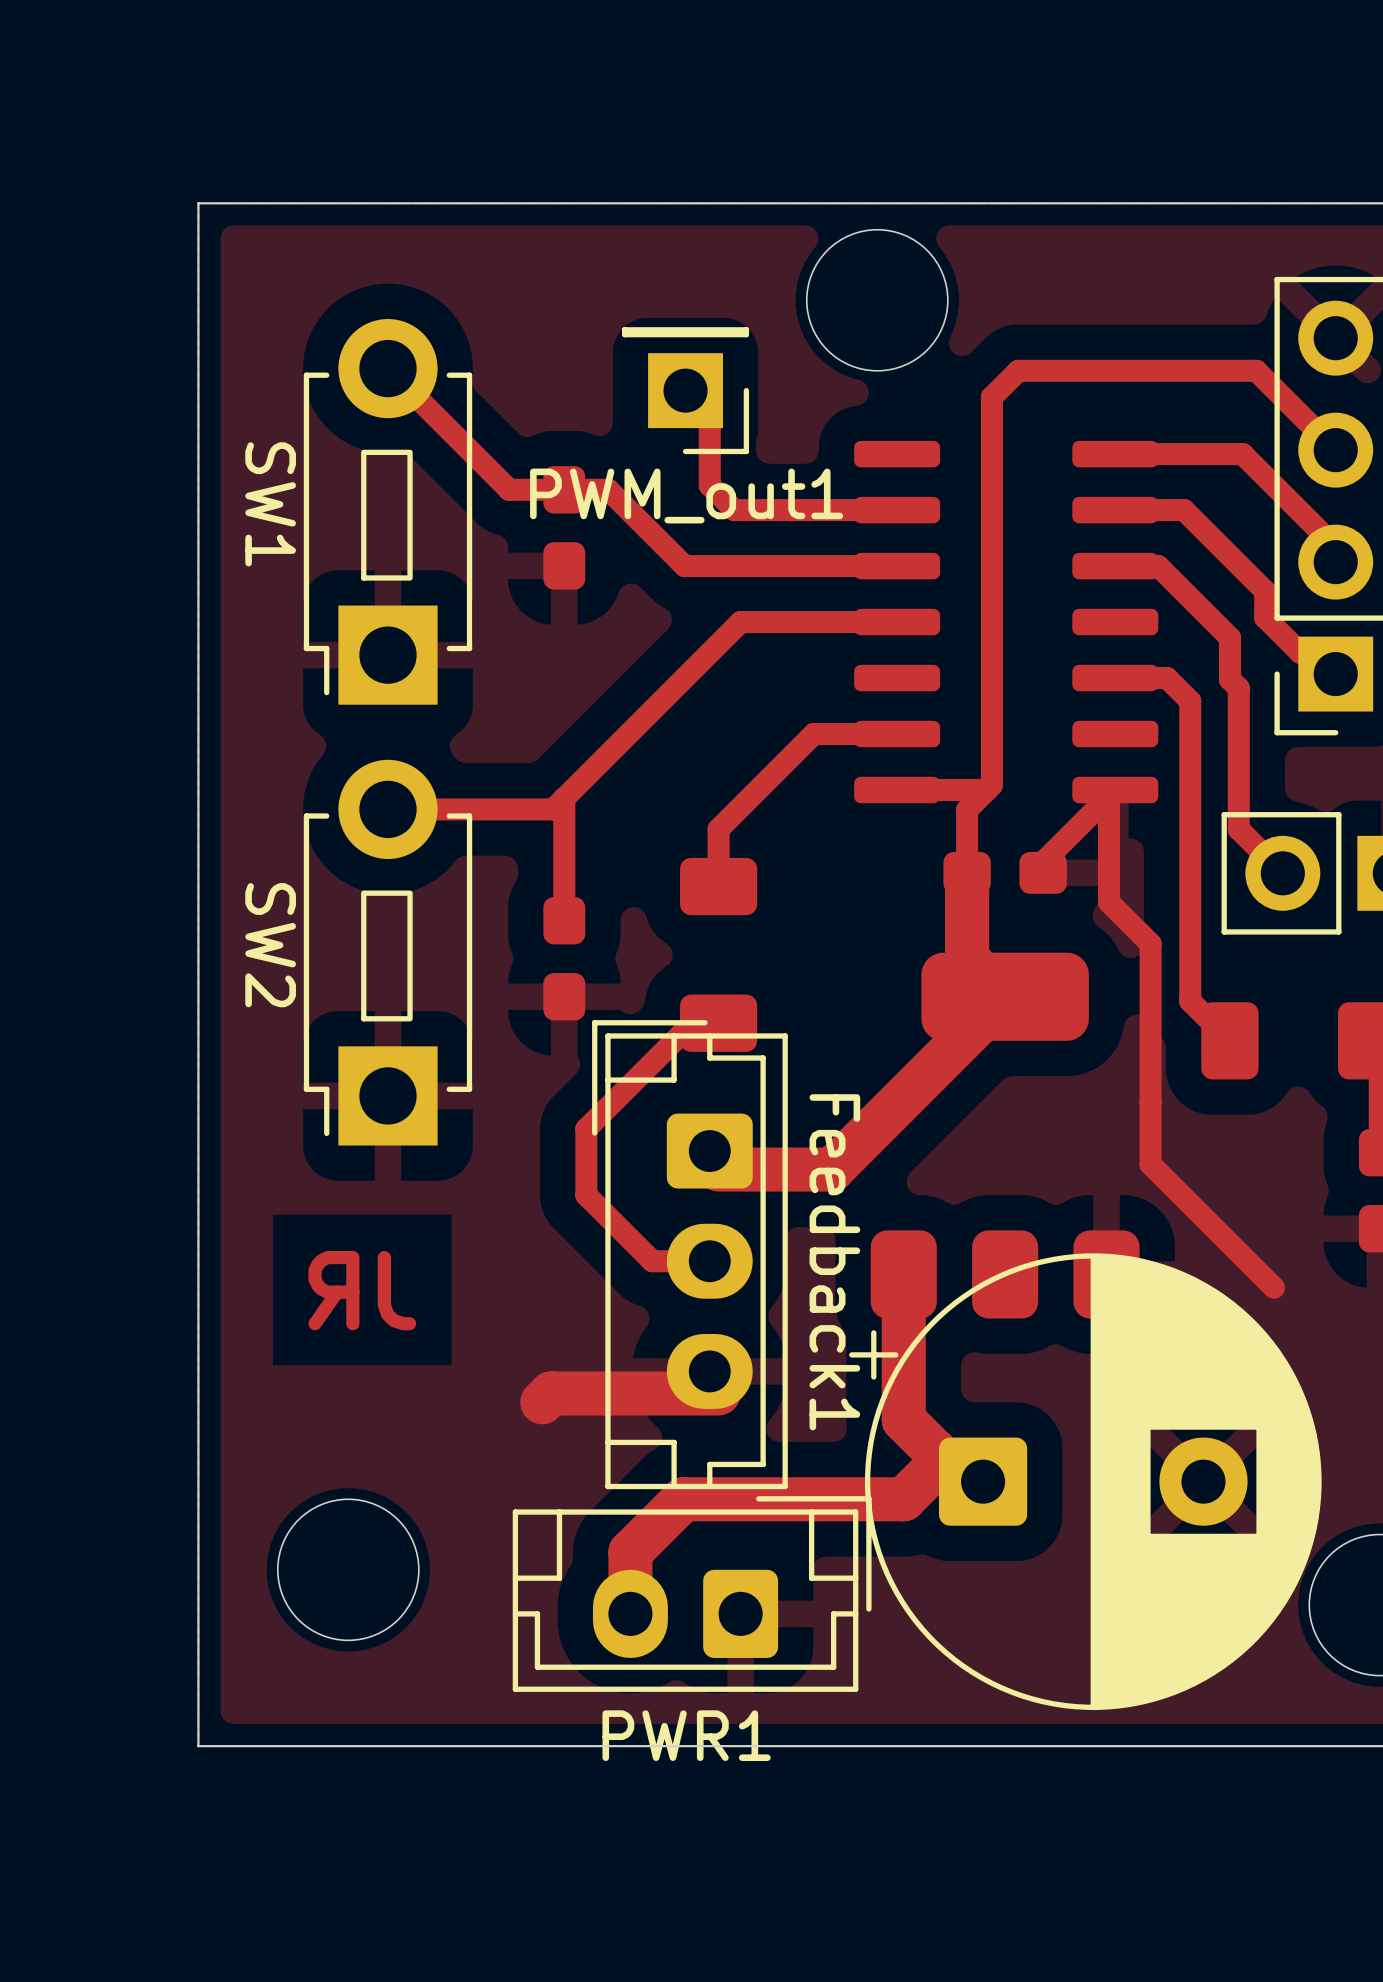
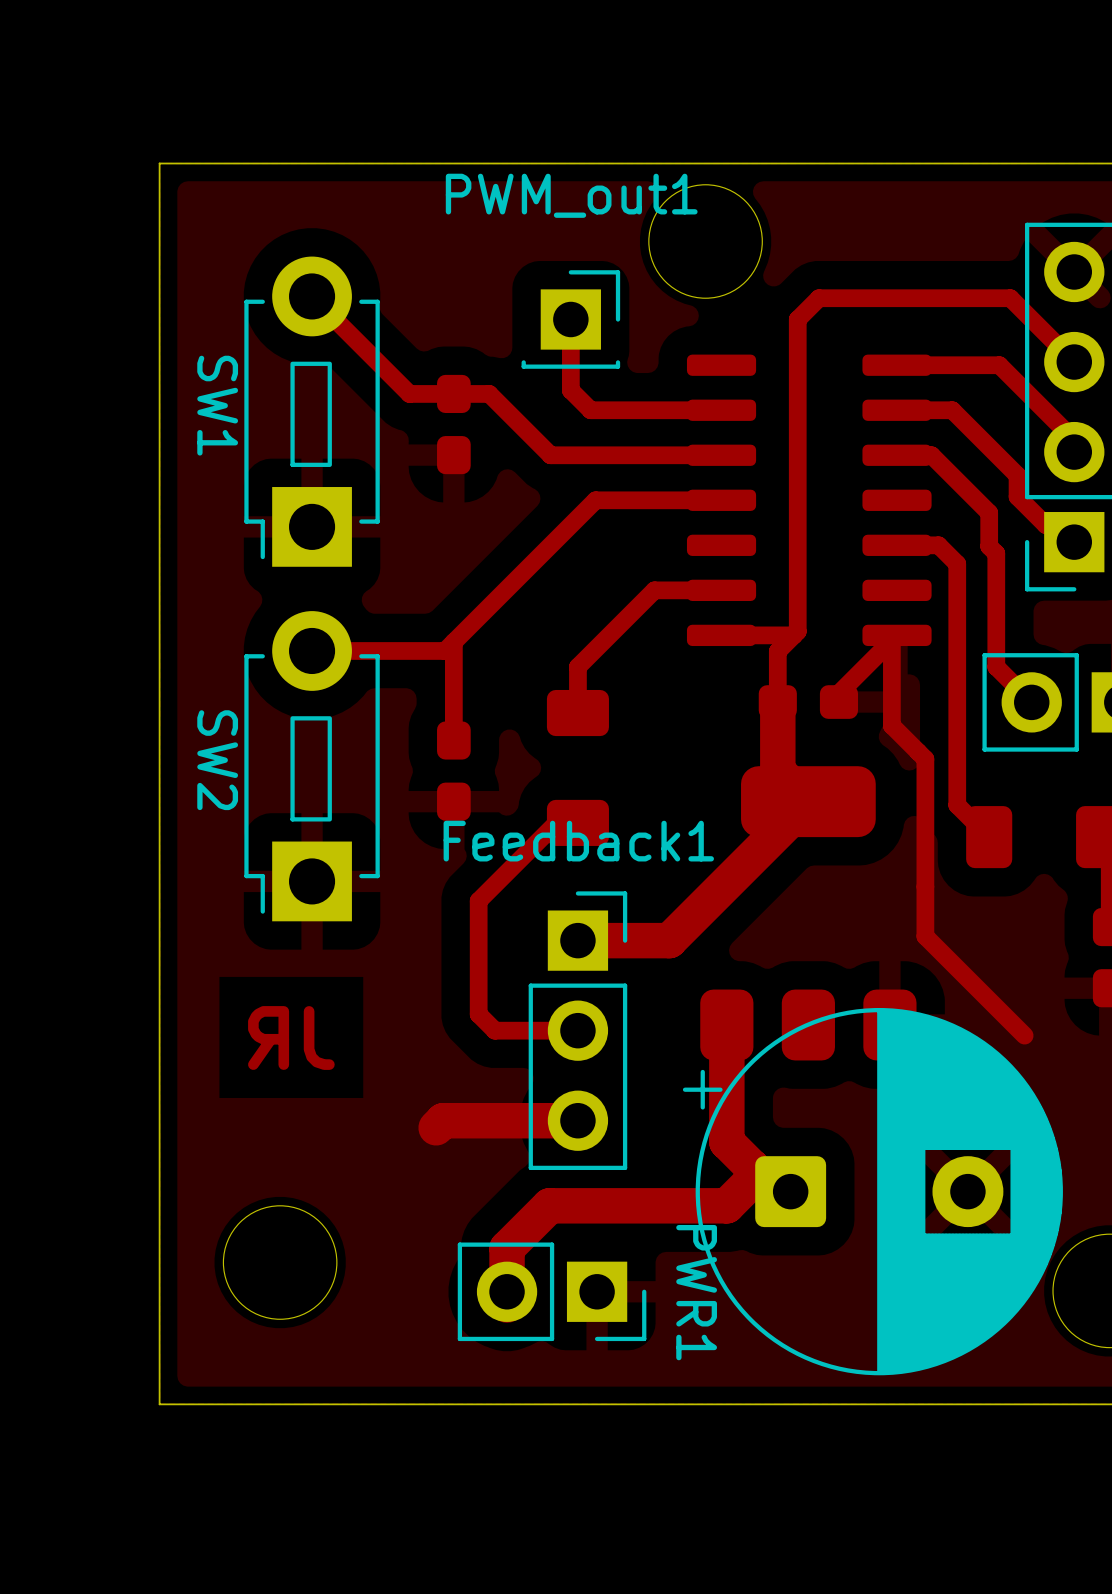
PWM_out1 footprint: [622, 327, 750, 455] -> [521, 270, 621, 369]
PWM_out1 name position: PWM_out1 (686, 496) -> PWM_out1 (571, 195)
Feedback1 footprint: [592, 1020, 788, 1490] -> [528, 891, 628, 1171]
top track: (595, 1120) (586, 1128) (586, 1195) (652, 1261) (709, 1261) -> (478, 900) (478, 1014) (494, 1030) (577, 1030)
Feedback1 name position: Feedback1 (834, 1262) -> Feedback1 (578, 841)
PWR1 footprint: [512, 1496, 872, 1692] -> [457, 1242, 647, 1342]
PWR1 name position: PWR1 (686, 1735) -> PWR1 (696, 1292)

